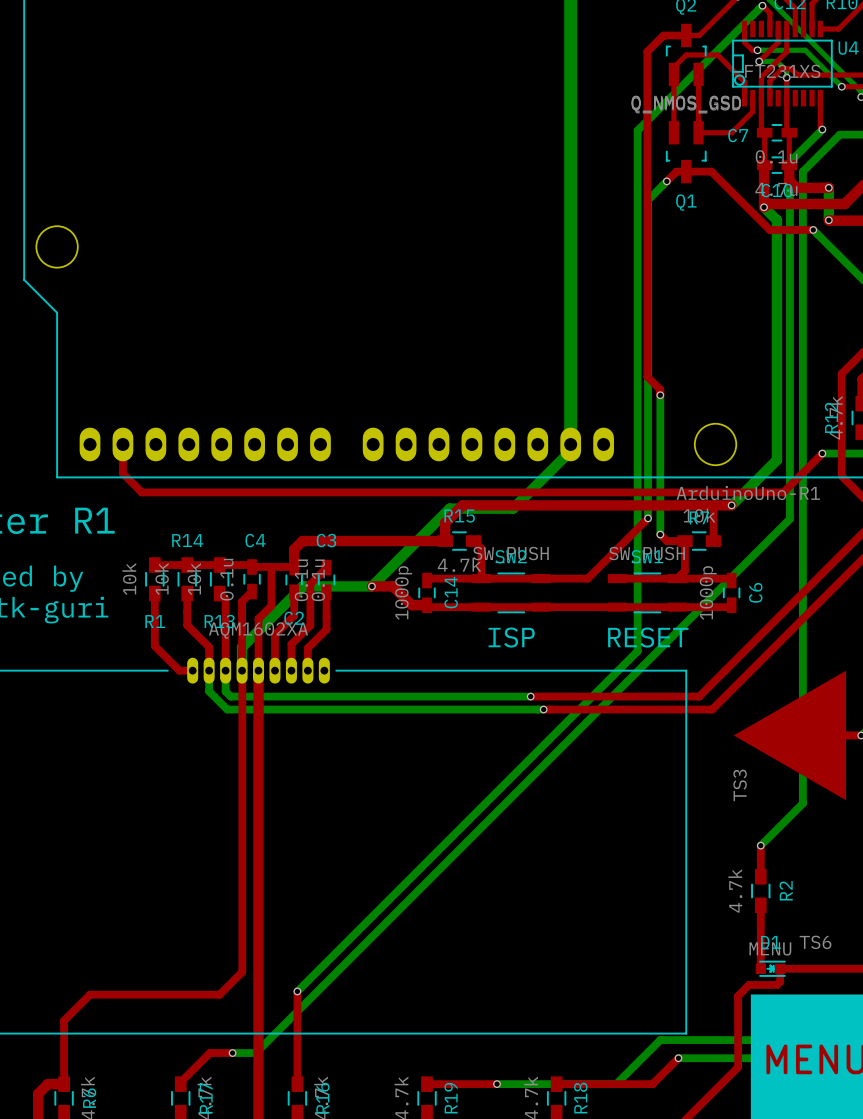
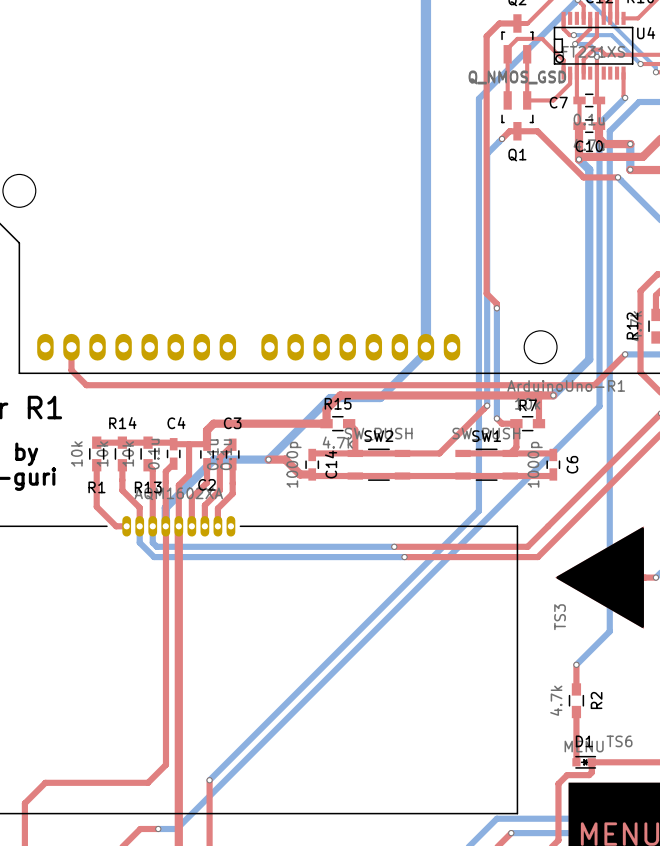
text: ISP (511, 637) -> none
text: RESET (648, 637) -> none
drawing: none -> [556, 527, 644, 628]

